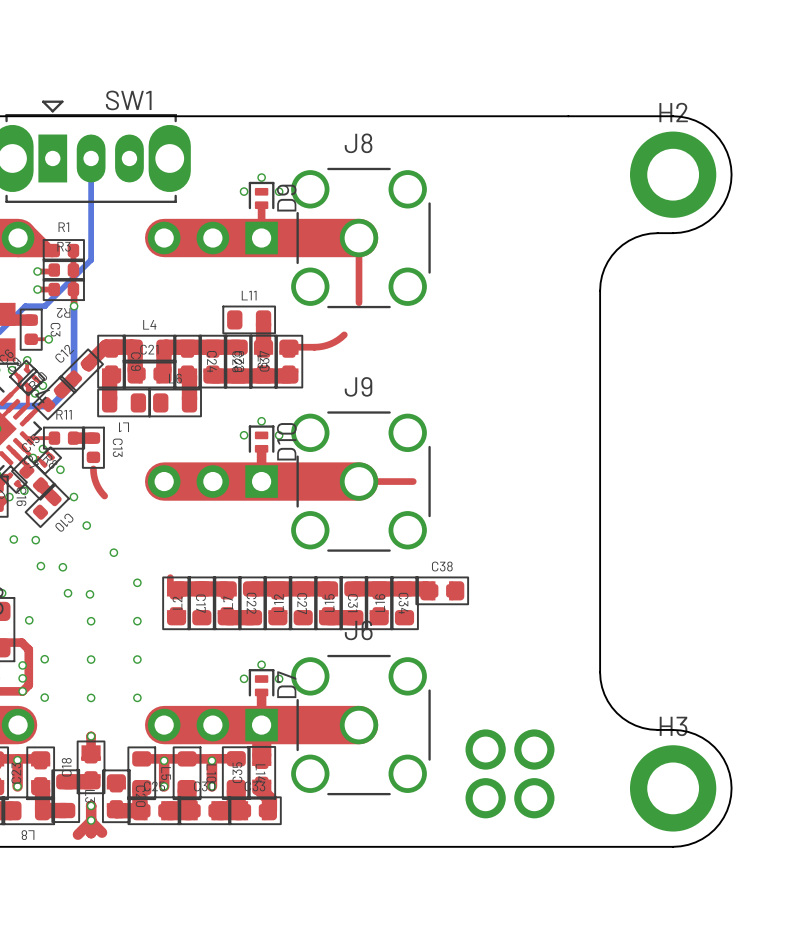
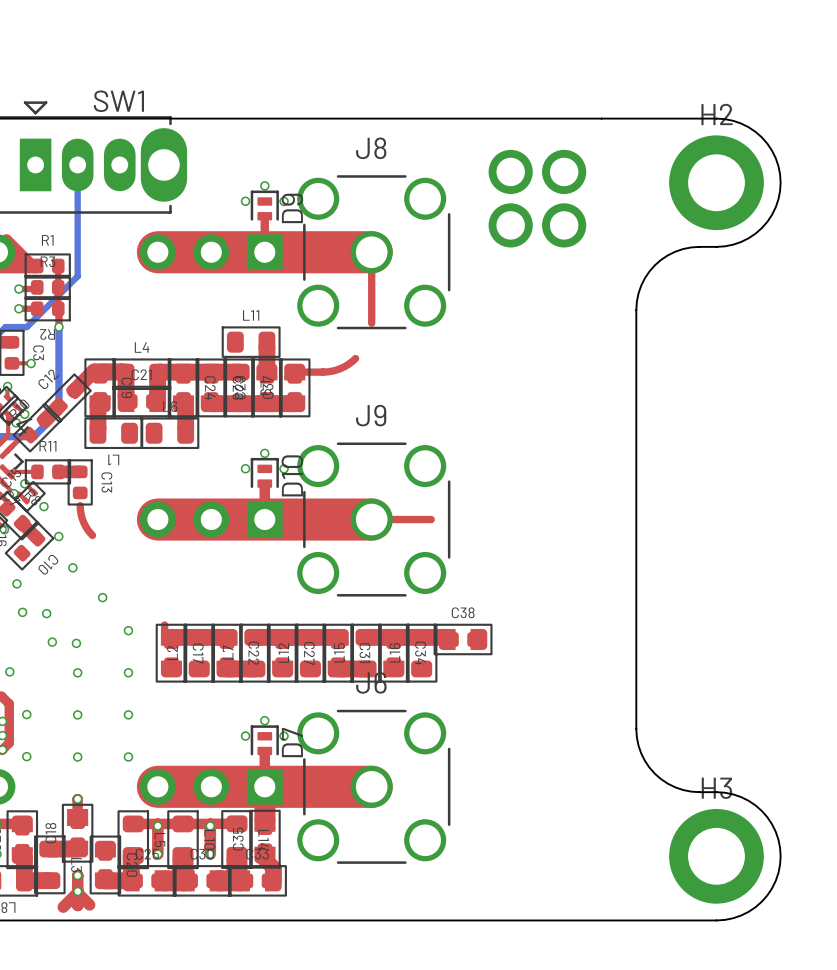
part: none -> (537, 198)
part: (509, 773) -> none

